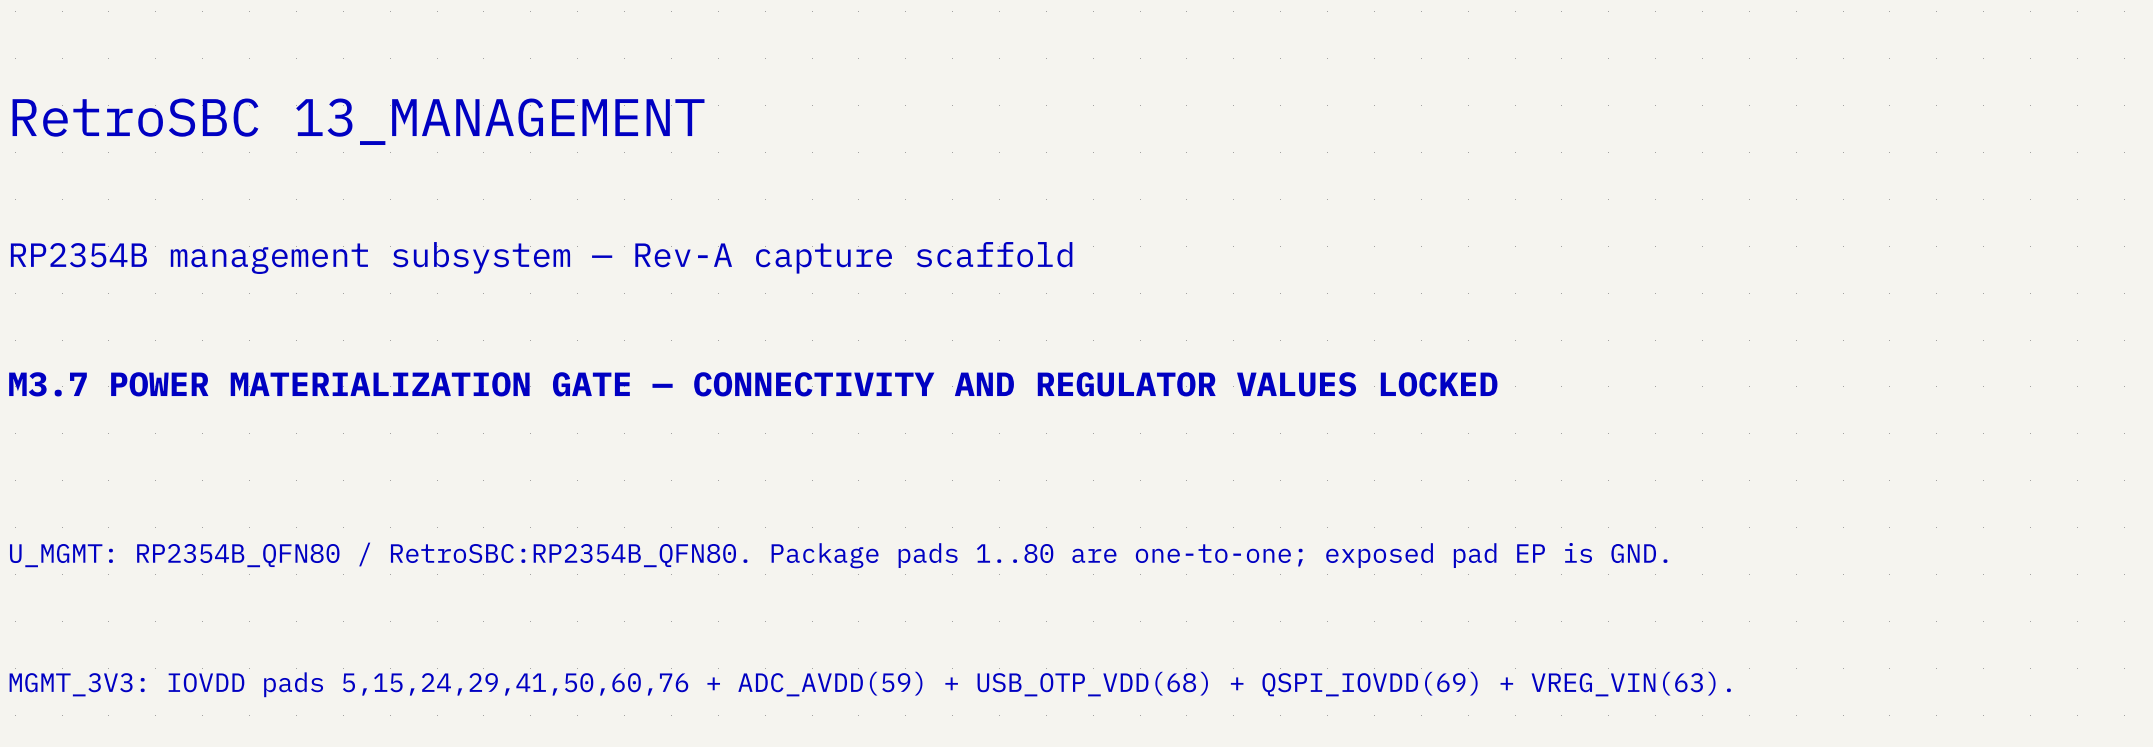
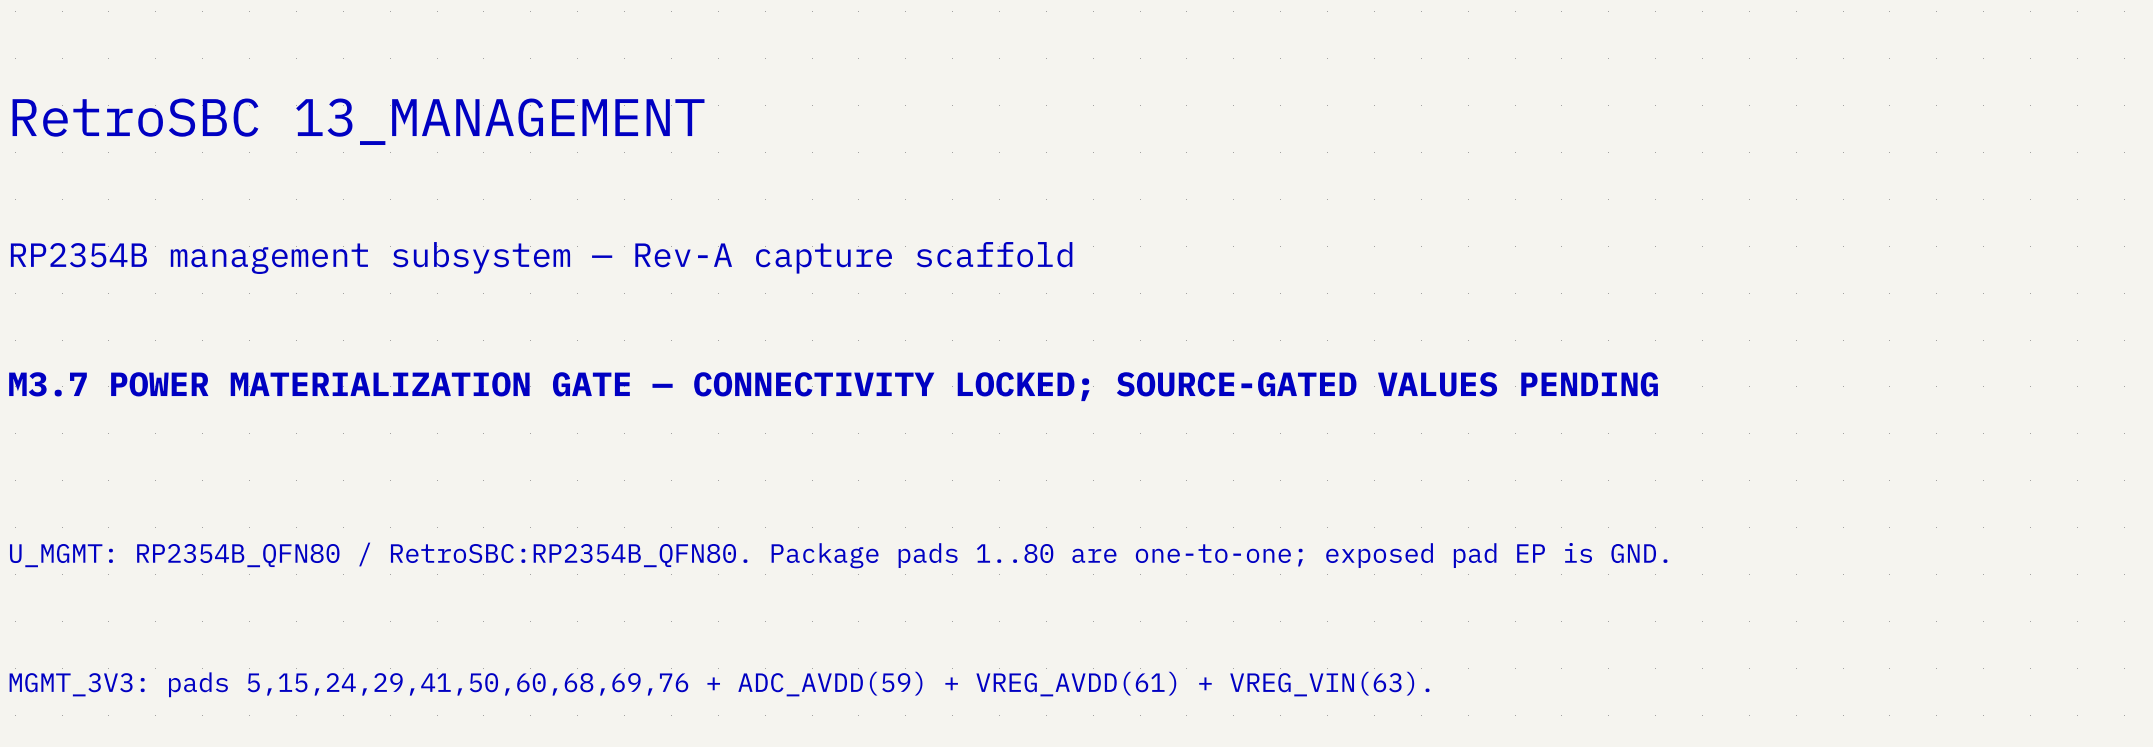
text: M3.7 POWER MATERIALIZATION GATE — CONNECTIVITY AND REGULATOR VALUES LOCKED (753, 384) -> M3.7 POWER MATERIALIZATION GATE — CONNECTIVITY LOCKED; SOURCE-GATED VALUES PENDING (833, 386)
text: MGMT_3V3: IOVDD pads 5,15,24,29,41,50,60,76 + ADC_AVDD(59) + USB_OTP_VDD(68) + QSPI_IOVDD(69) + VREG_VIN(63). (870, 684) -> MGMT_3V3: pads 5,15,24,29,41,50,60,68,69,76 + ADC_AVDD(59) + VREG_AVDD(61) + VREG_VIN(63). (719, 684)

